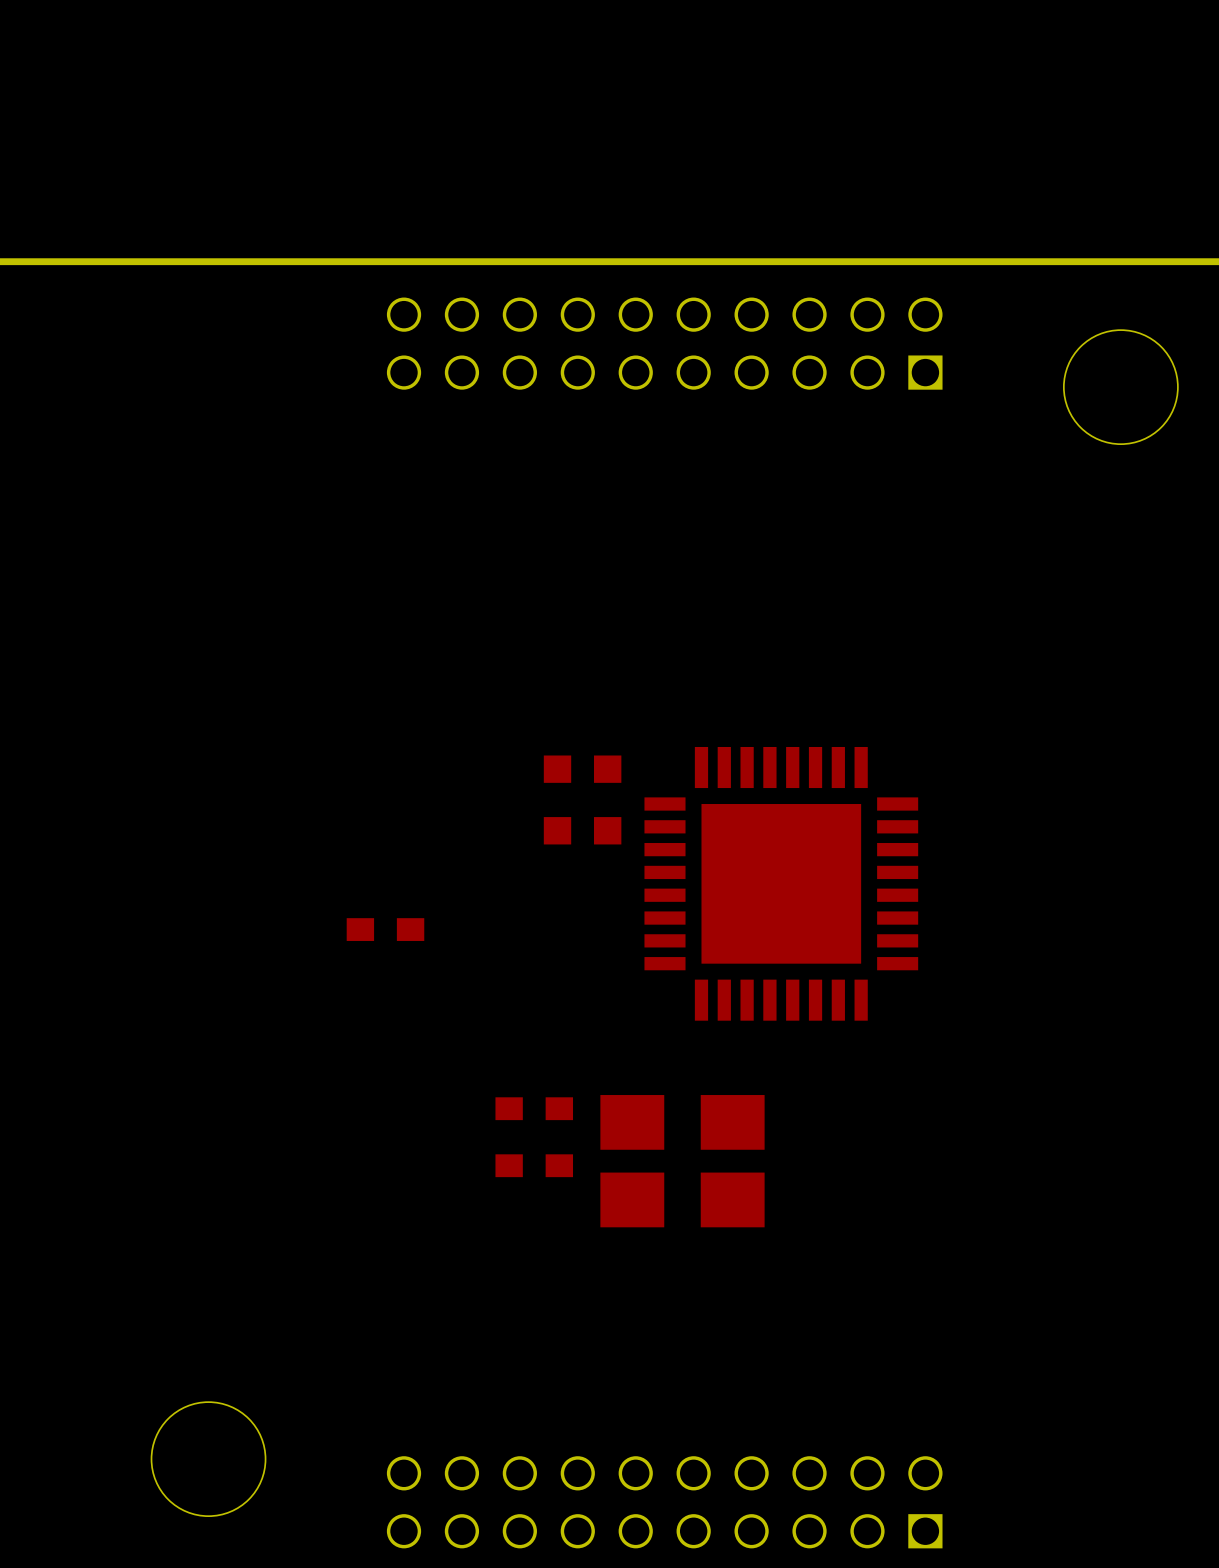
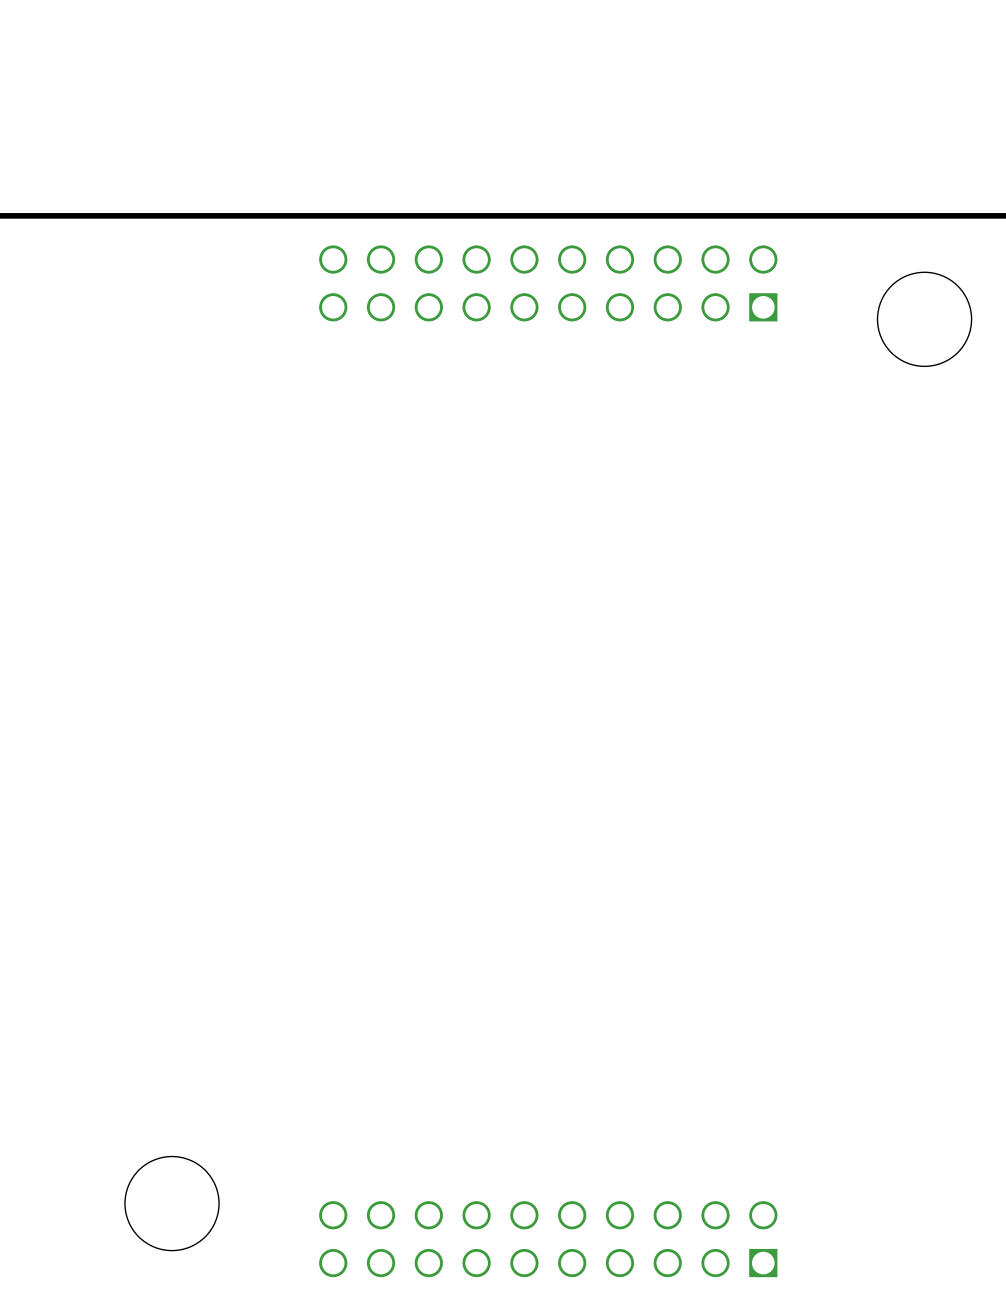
part: (582, 769) -> none
part: (582, 830) -> none
part: (781, 883) -> none
part: (385, 929) -> none
part: (534, 1108) -> none
part: (682, 1161) -> none
part: (534, 1165) -> none

